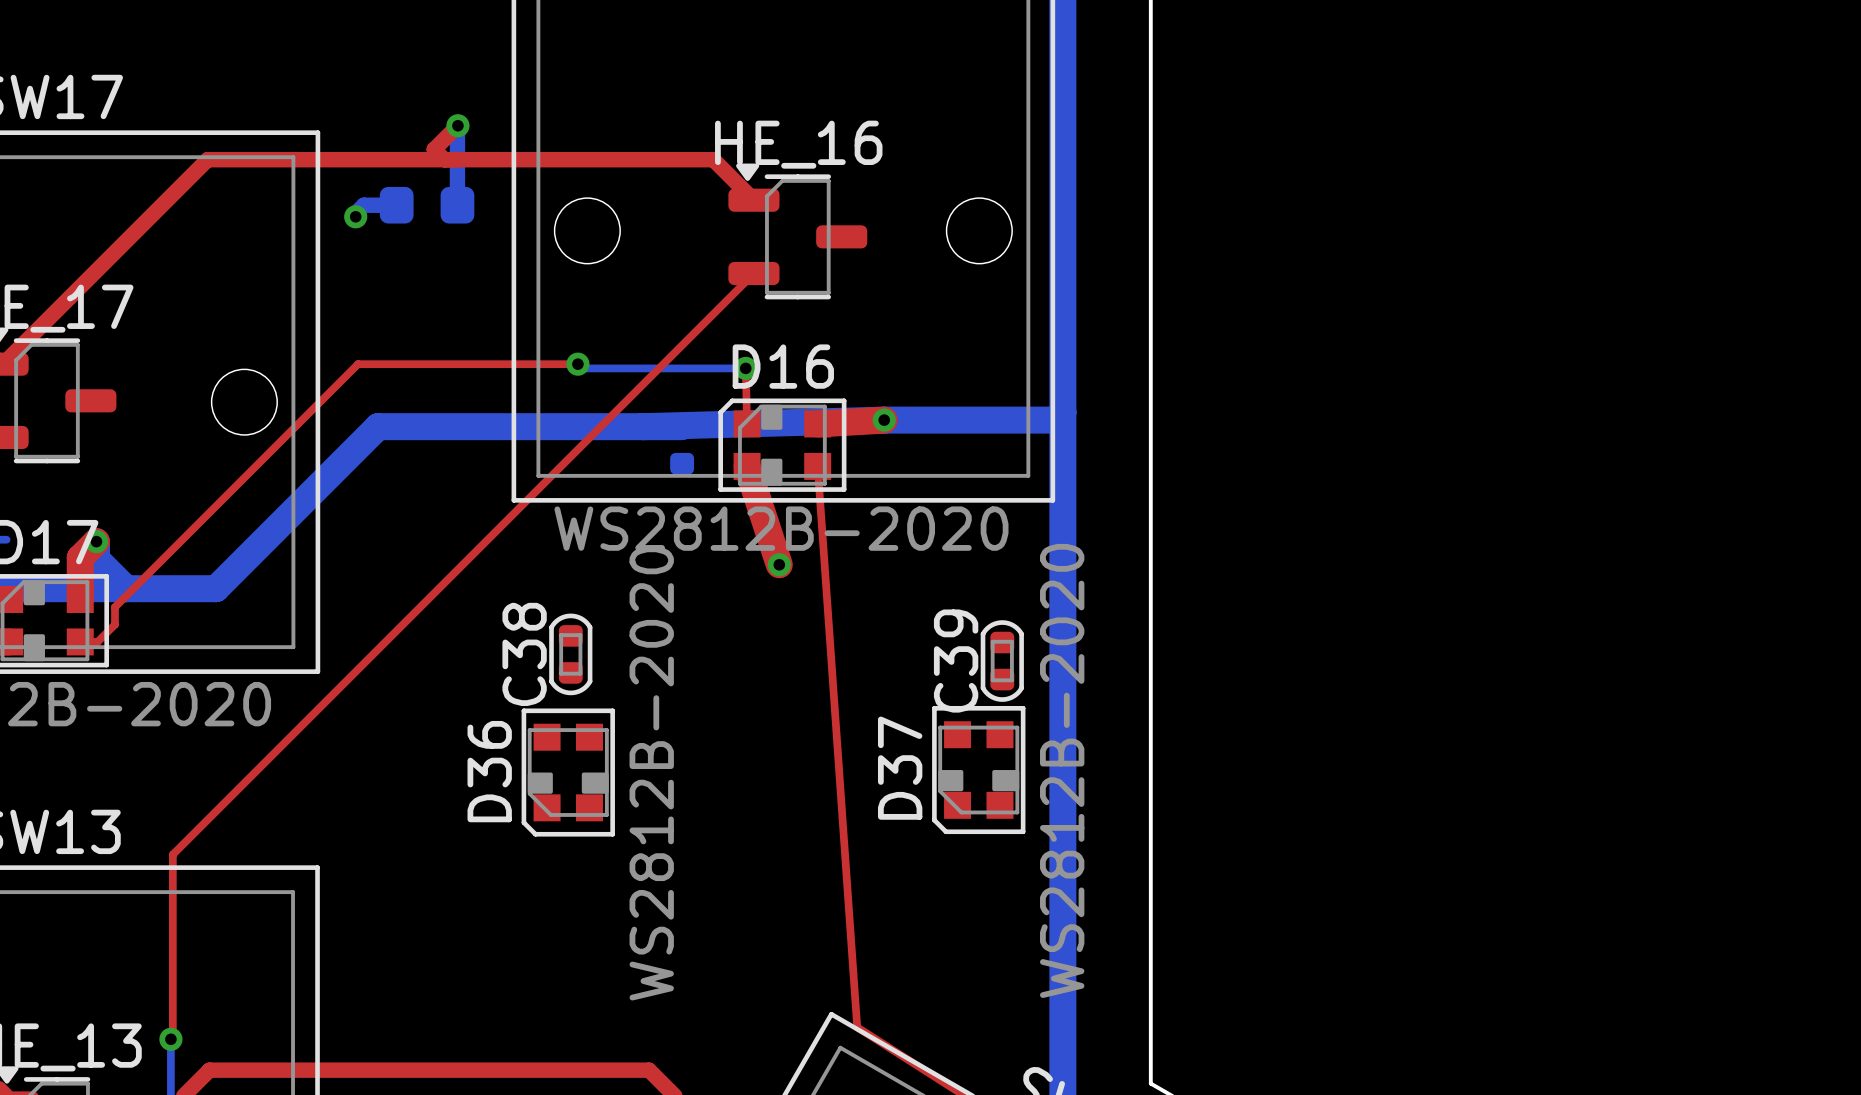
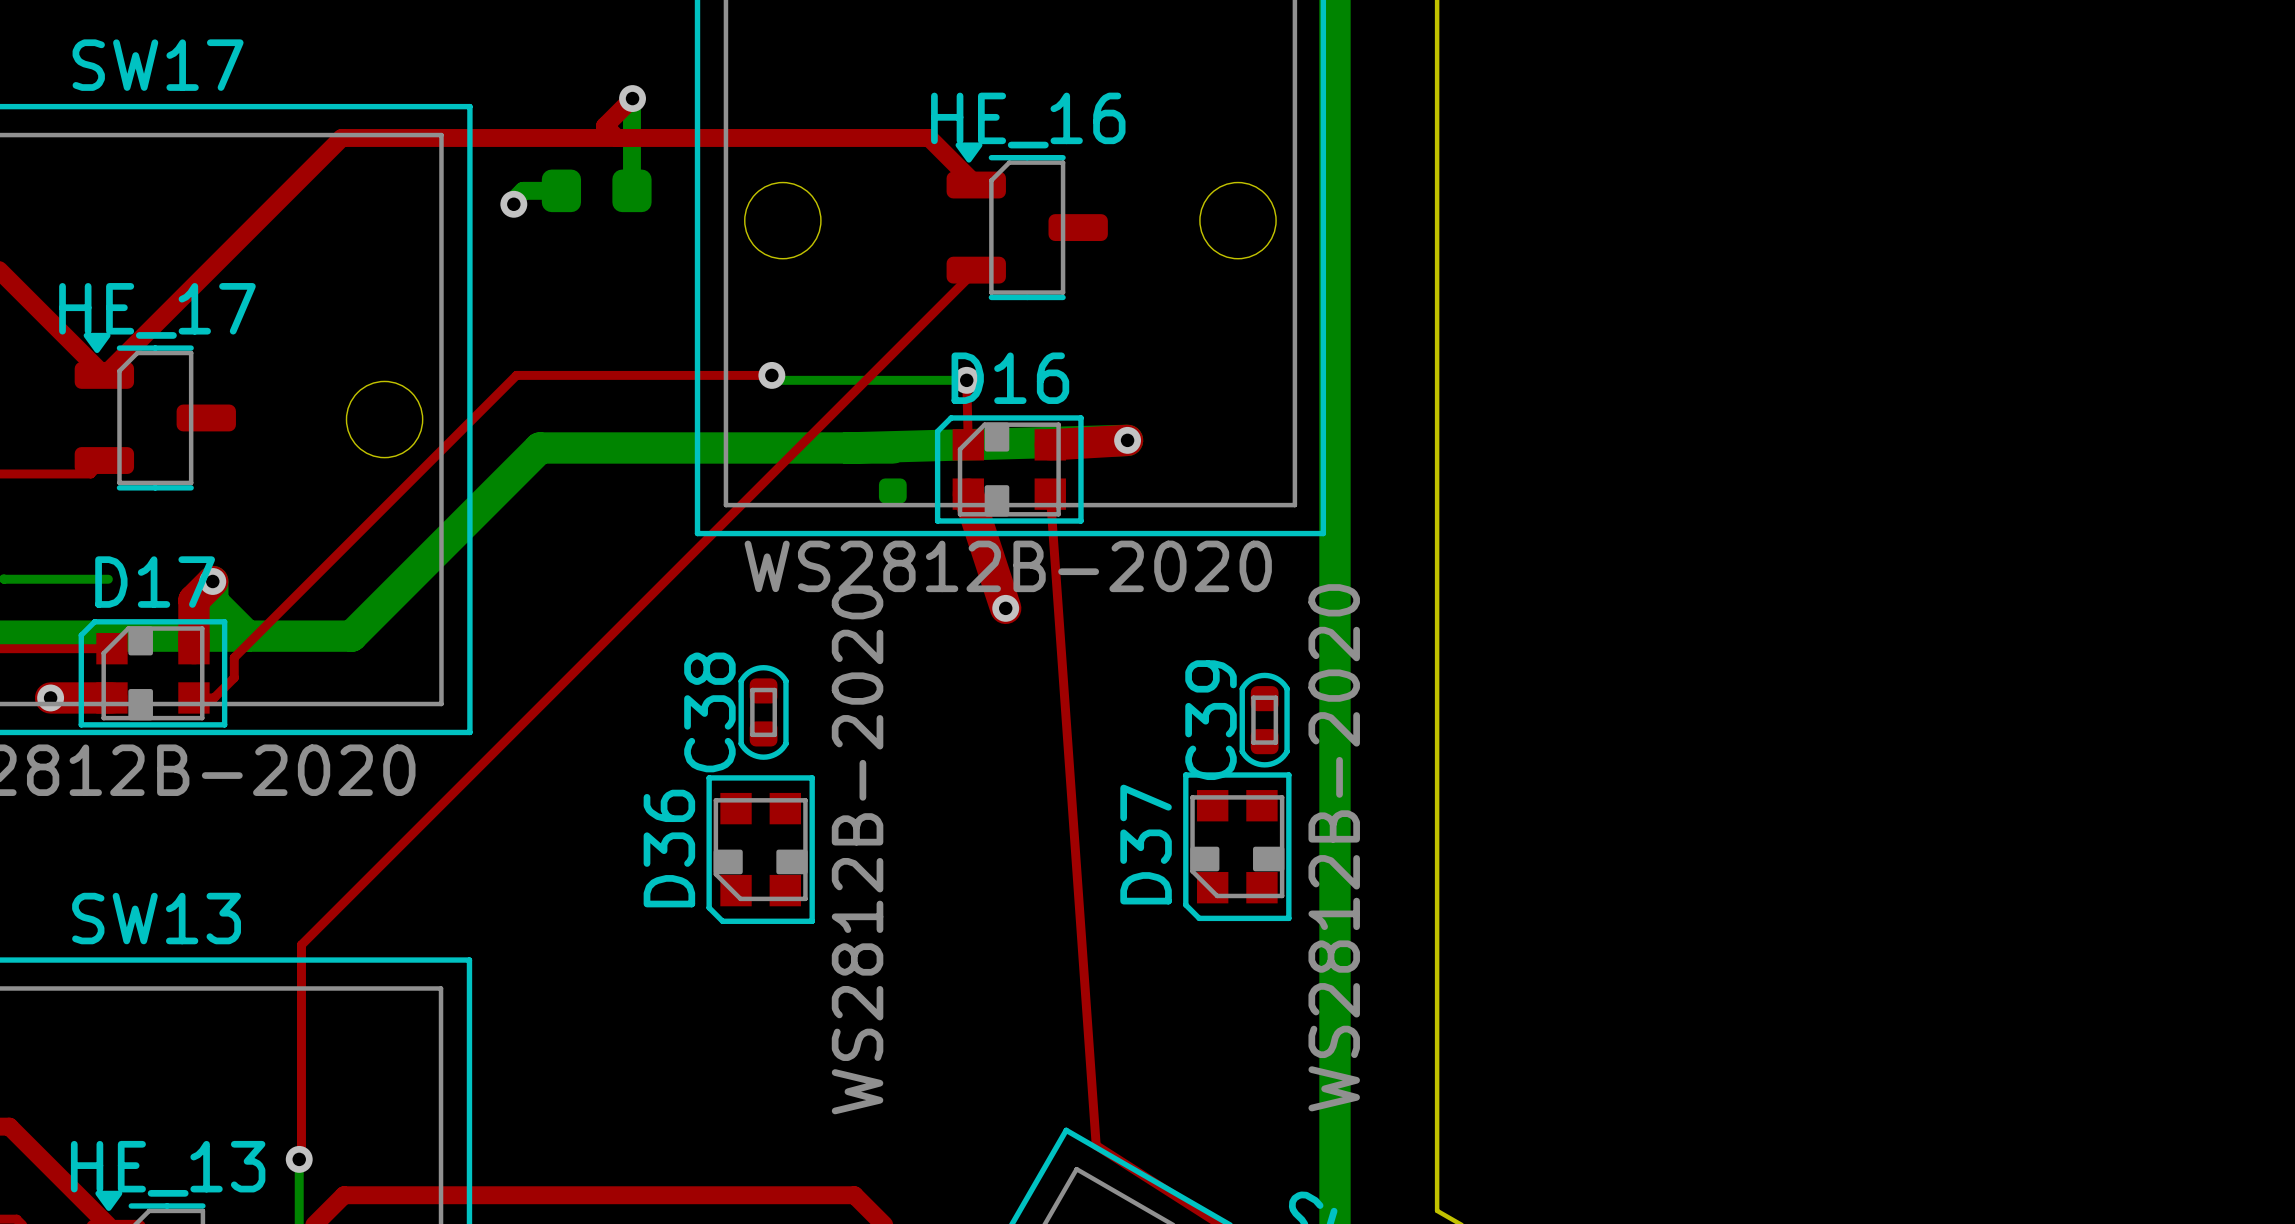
bottom track: (1062, 412) (1055, 420) (884, 420) -> none

